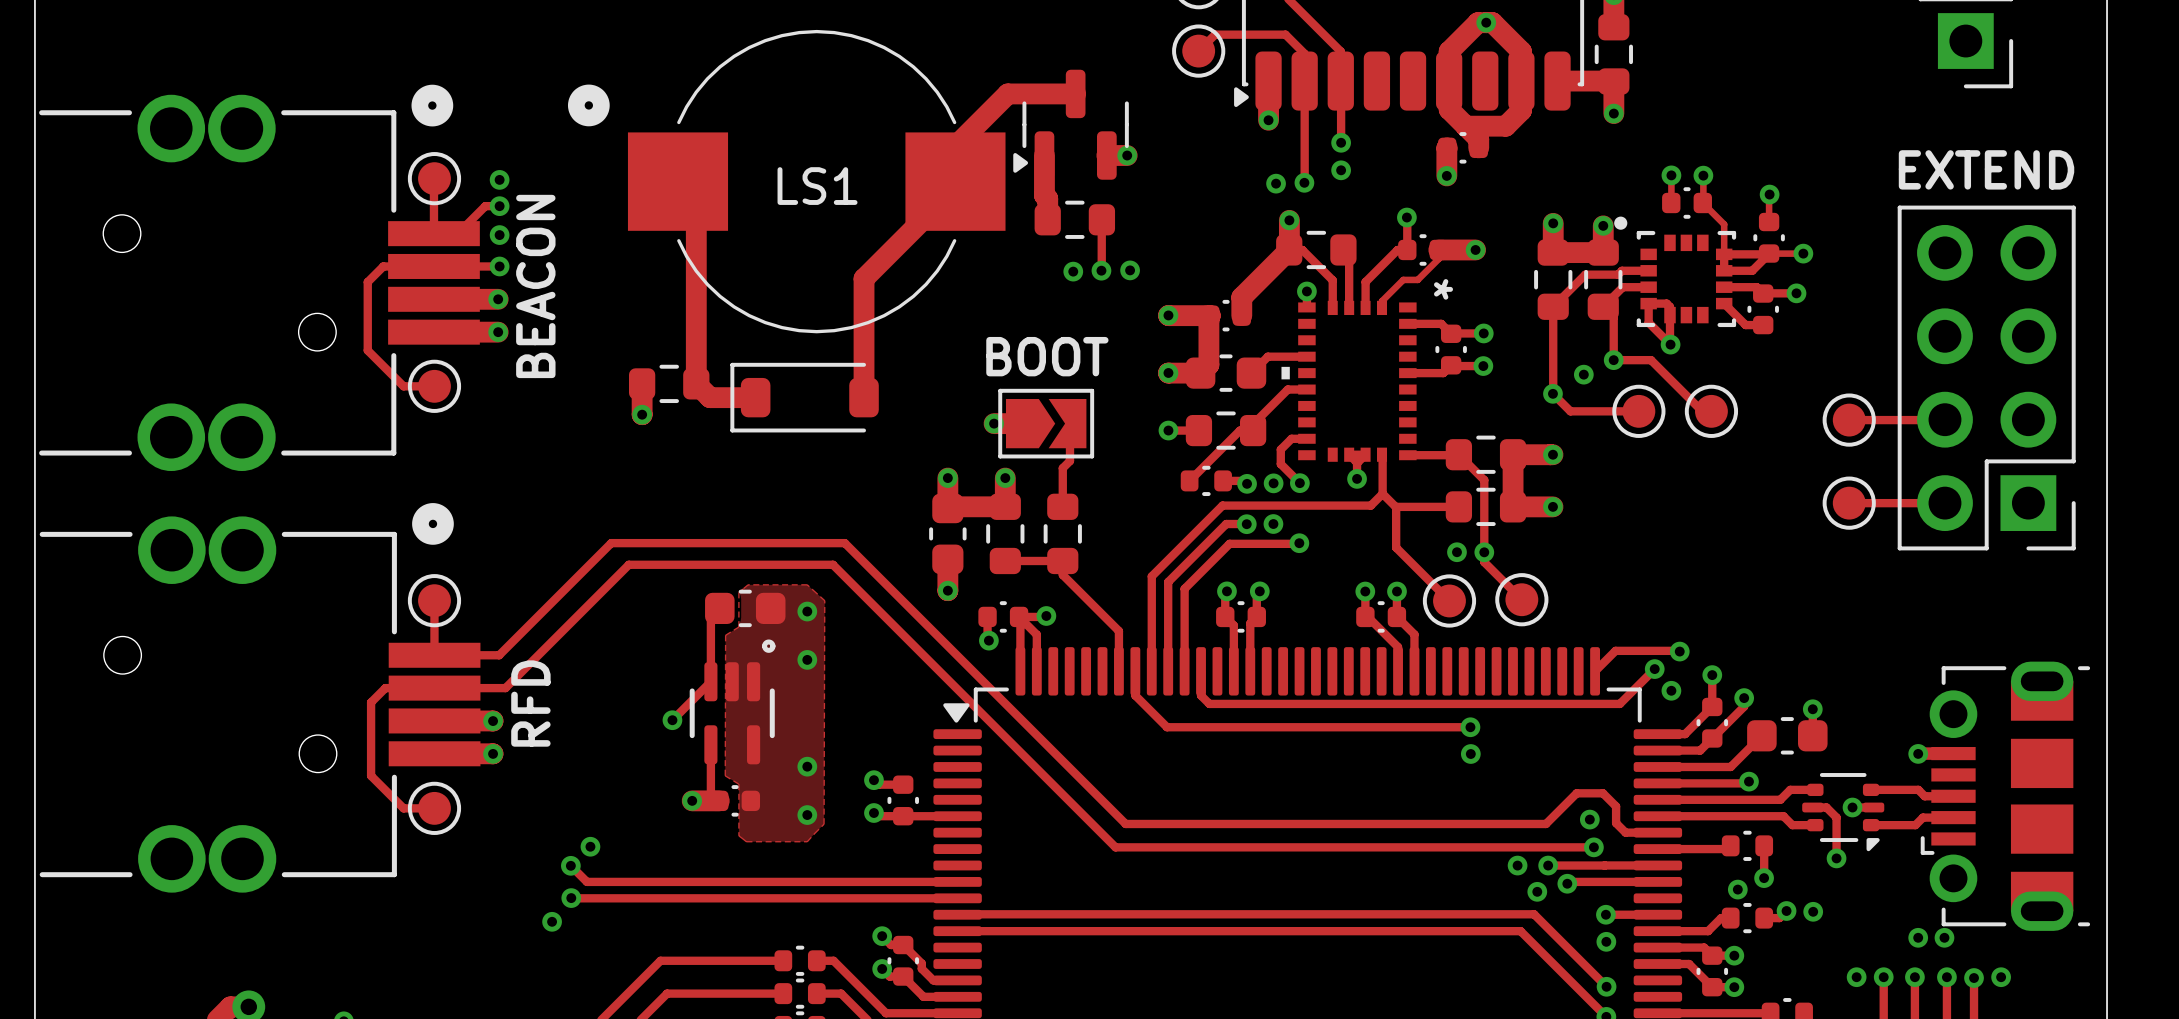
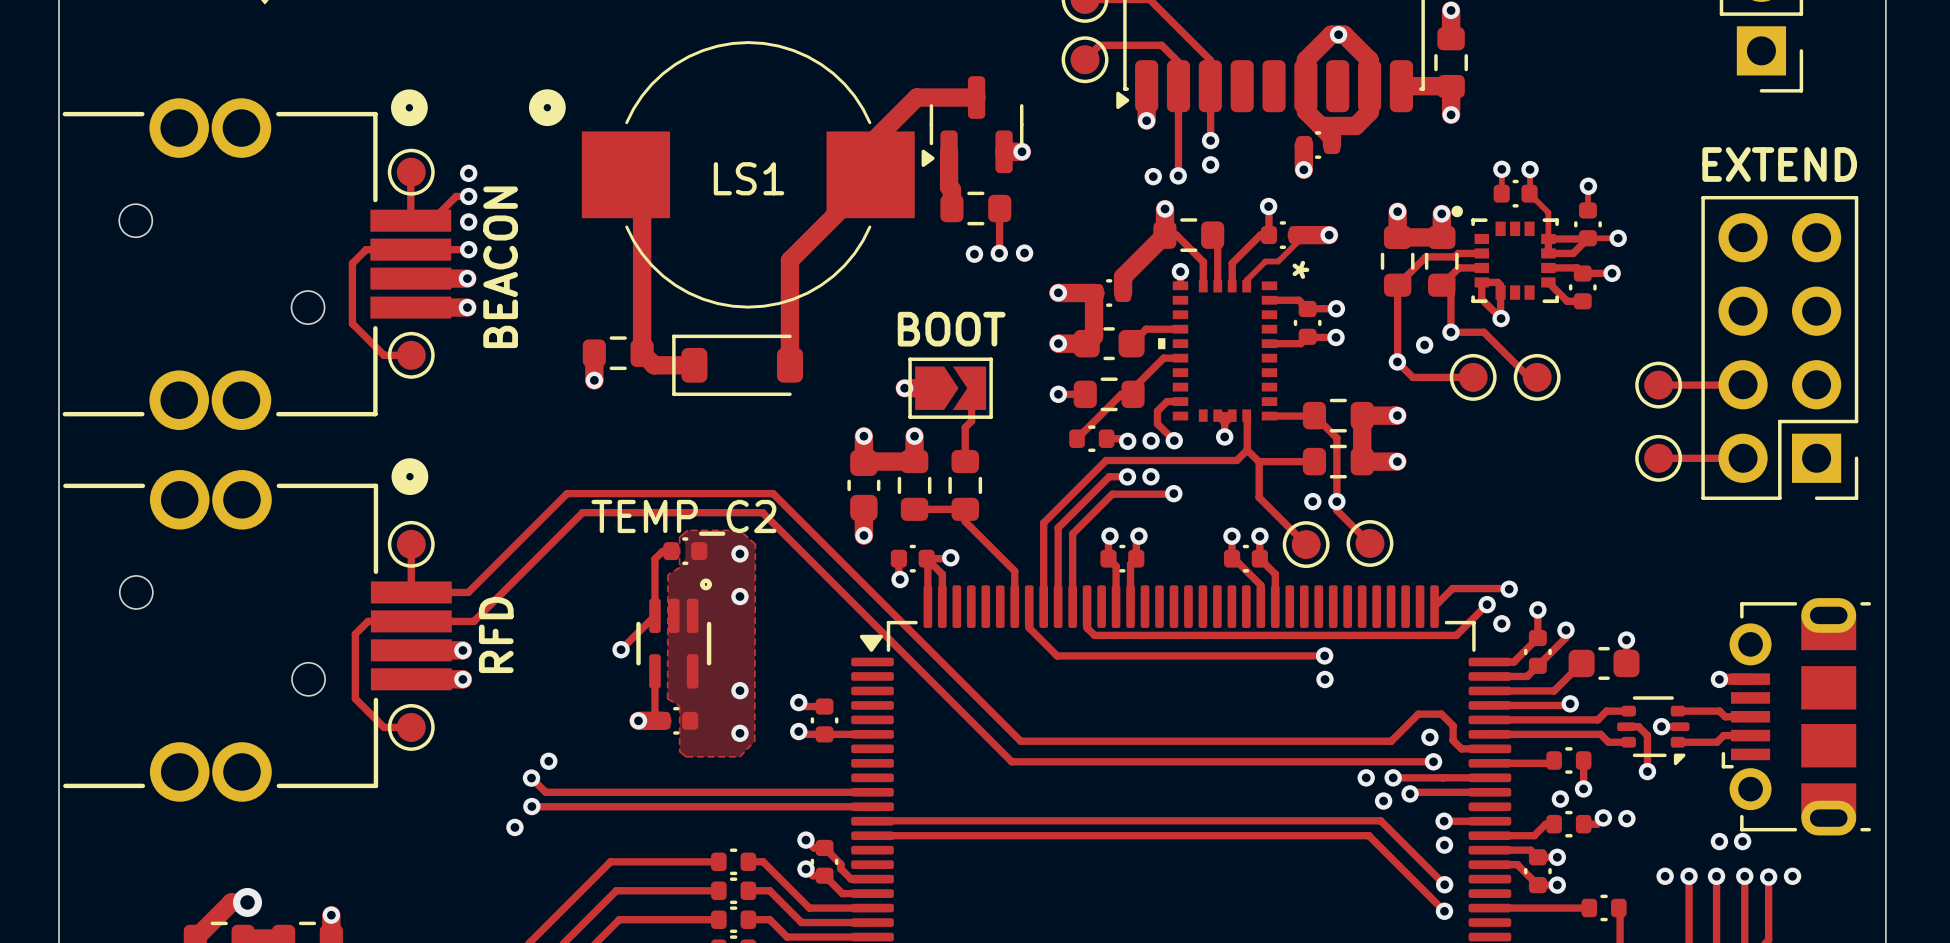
part: (745, 608) -> none
TEMP_C2: none -> (685, 551)

